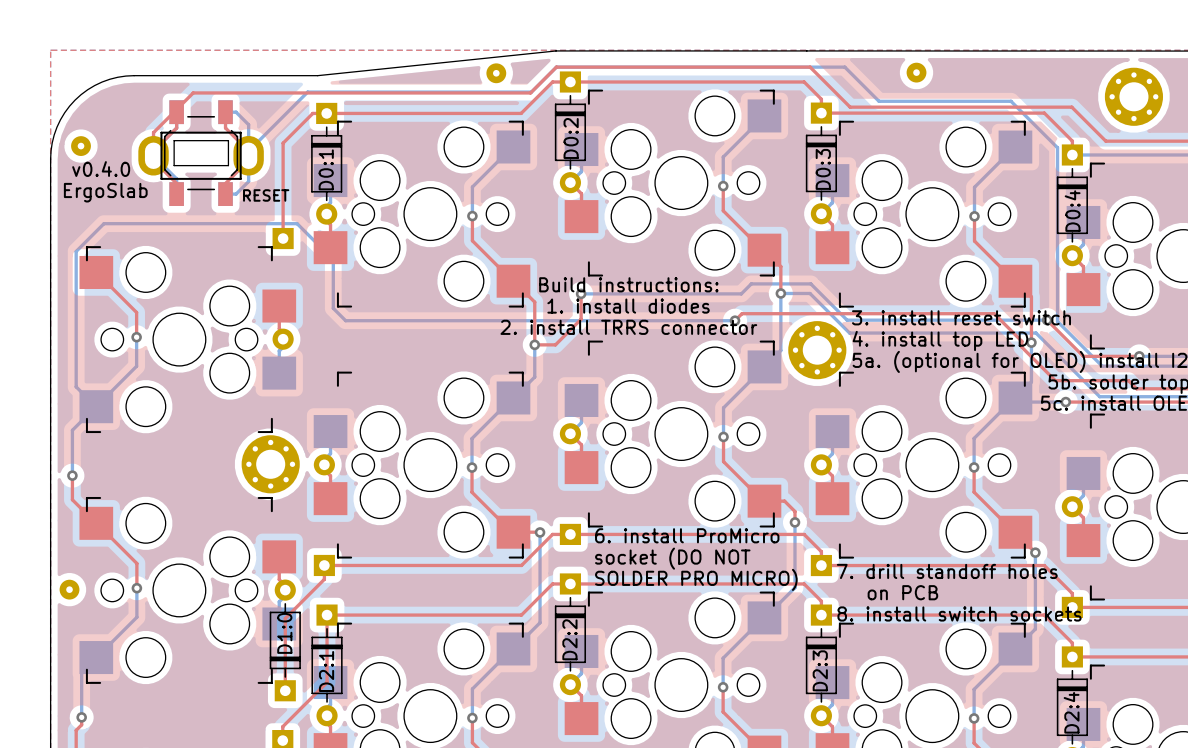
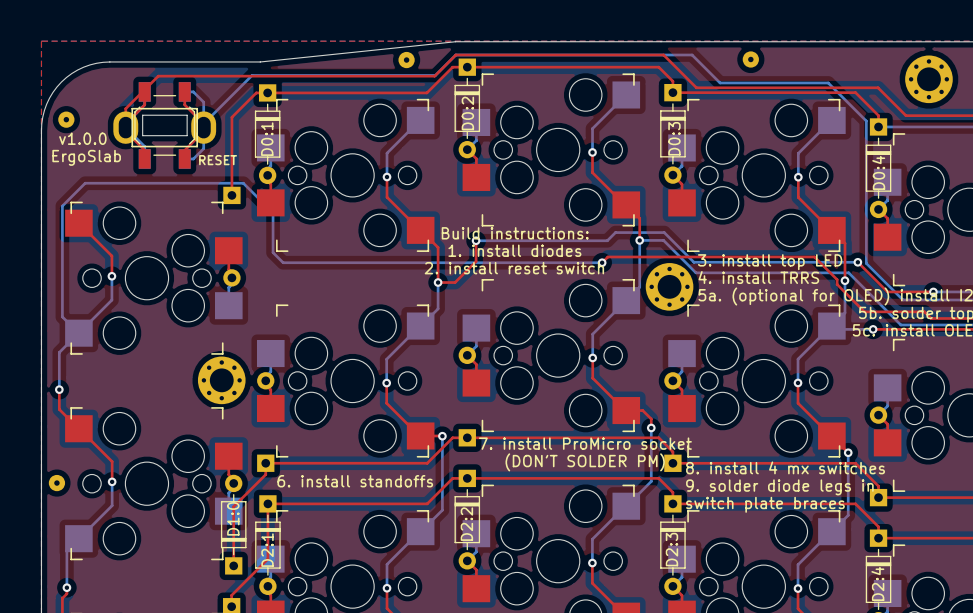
text: v0.4.0 (101, 169) -> v1.0.0 (82, 138)
text: 3. install reset switch (961, 317) -> 3. install top LED (770, 262)
text: 2. install TRRS connector (628, 327) -> 2. install reset switch (514, 268)
text: 4. install top LED (940, 340) -> 4. install TRRS (758, 277)
text: 6. install ProMicro (687, 535) -> 7. install ProMicro socket (585, 443)
text: socket (DO NOT (672, 558) -> none
text: none -> (DON'T SOLDER PM) (585, 462)
text: 7. drill standoff holes (947, 571) -> 8. install 4 mx switches (785, 467)
text: SOLDER PRO MICRO) (696, 579) -> none
text: none -> 6. install standoffs (355, 481)
text: on PCB (902, 592) -> 9. solder diode legs in (779, 487)
text: 8. install switch sockets (959, 613) -> switch plate braces (765, 504)

